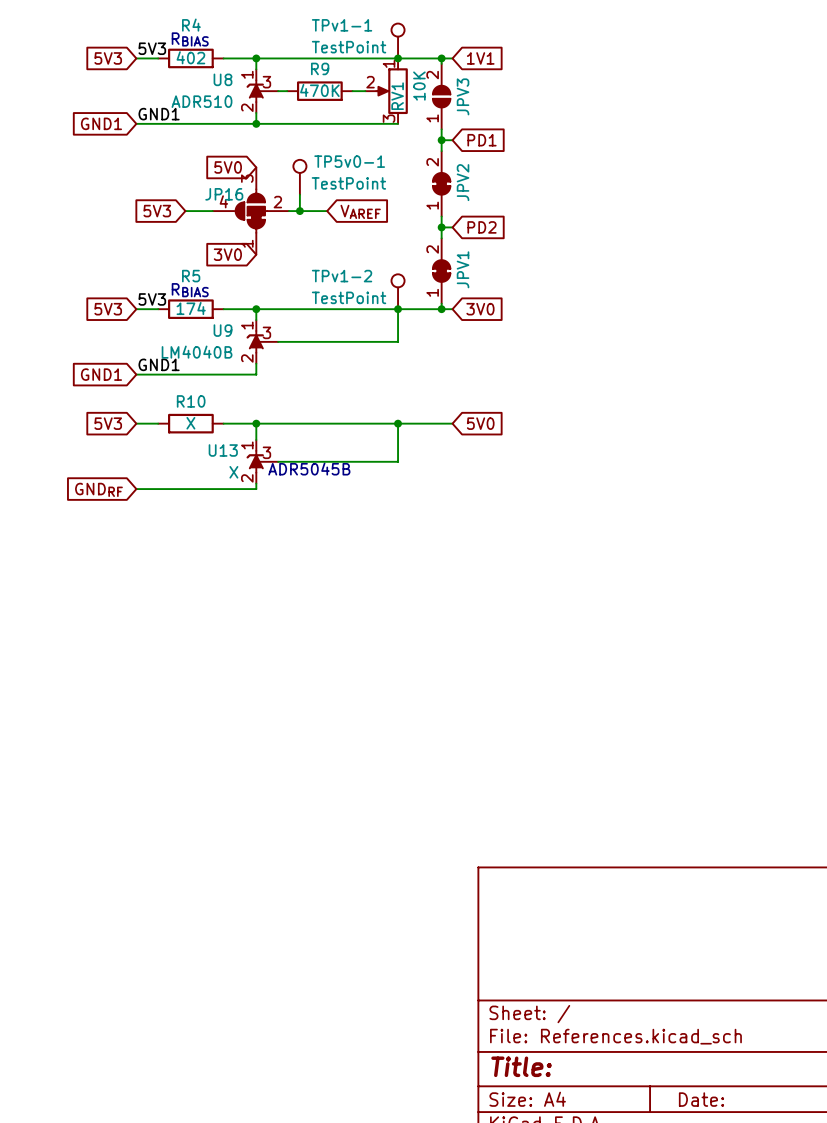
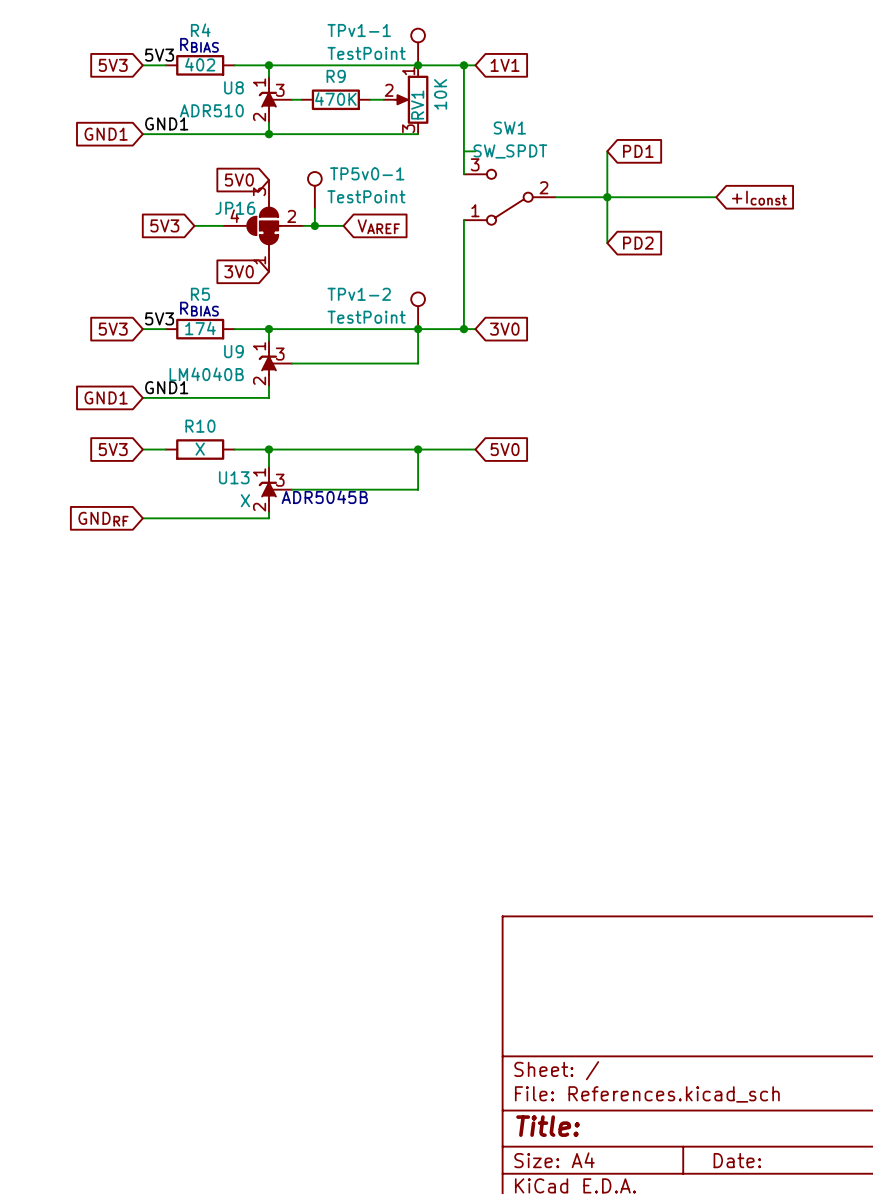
JPV3: (441, 96) -> none
junction: (441, 140) -> none
global label position: PD1 (482, 140) -> PD1 (638, 151)
wire: none -> (607, 151) (607, 243)
JPV2: (441, 183) -> none
SW1: none -> SW_SPDT (509, 197)
wire: none -> (555, 197) (716, 197)
junction: none -> (607, 197)
global label: none -> +Iconst (759, 198)
wire: (441, 227) (452, 227) -> none
junction: (441, 227) -> none
global label position: PD2 (482, 227) -> PD2 (638, 243)
JPV1: (441, 271) -> none

